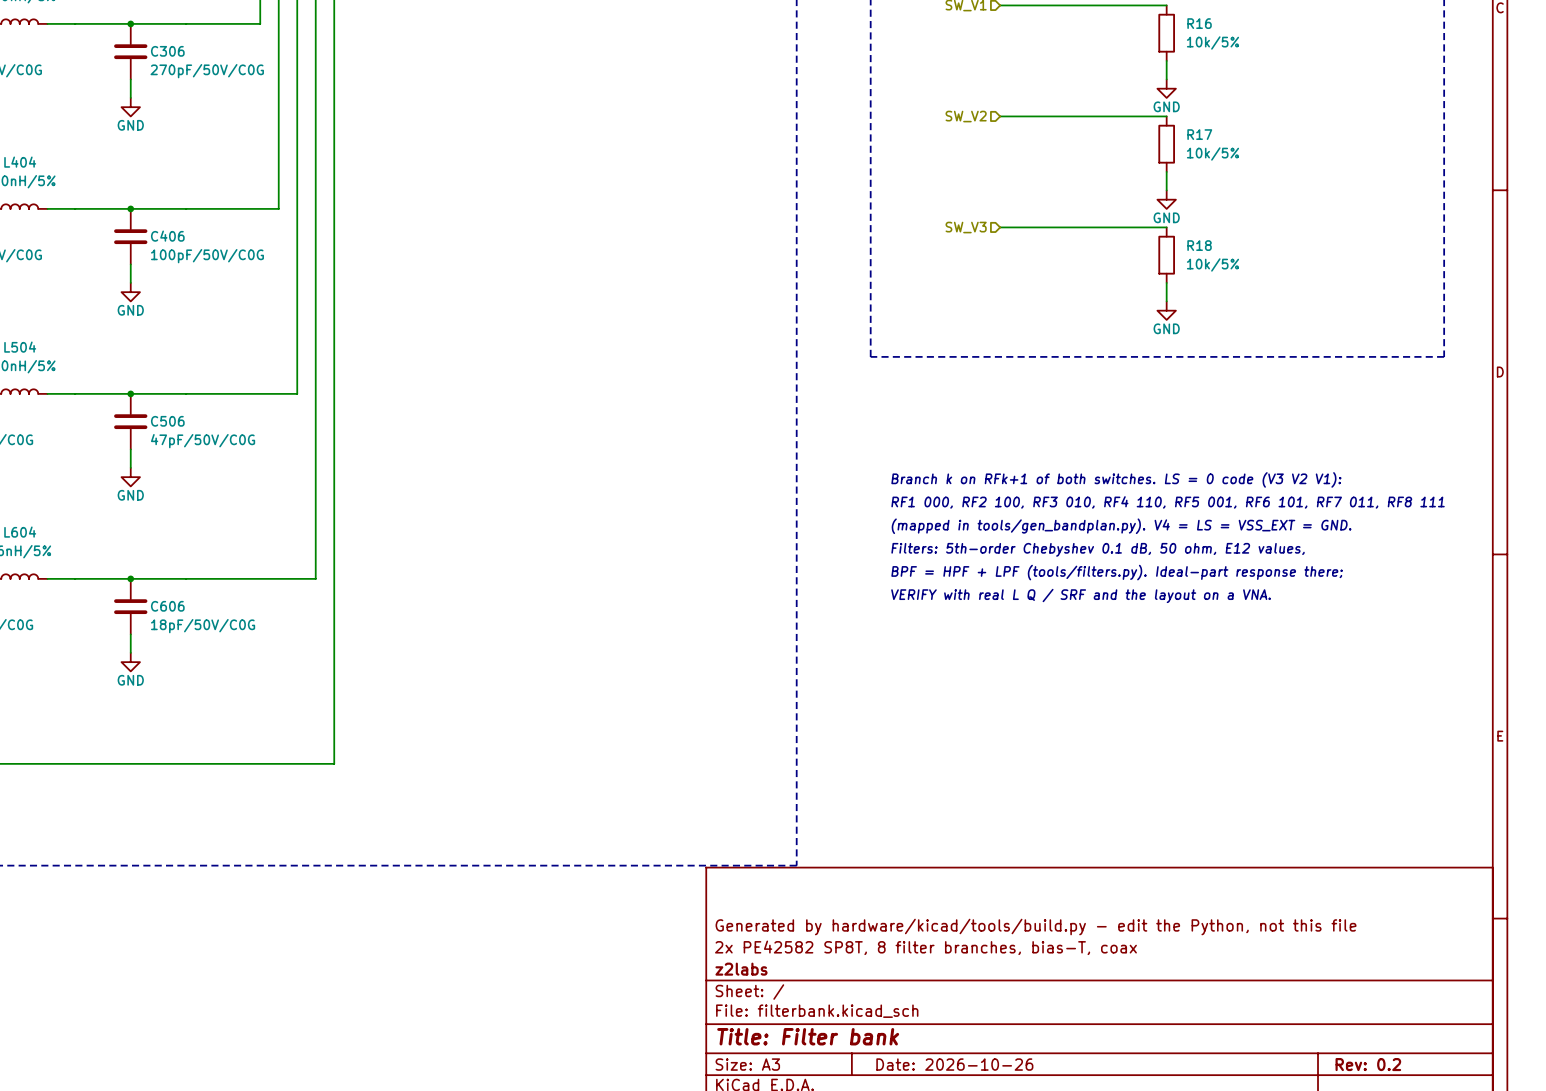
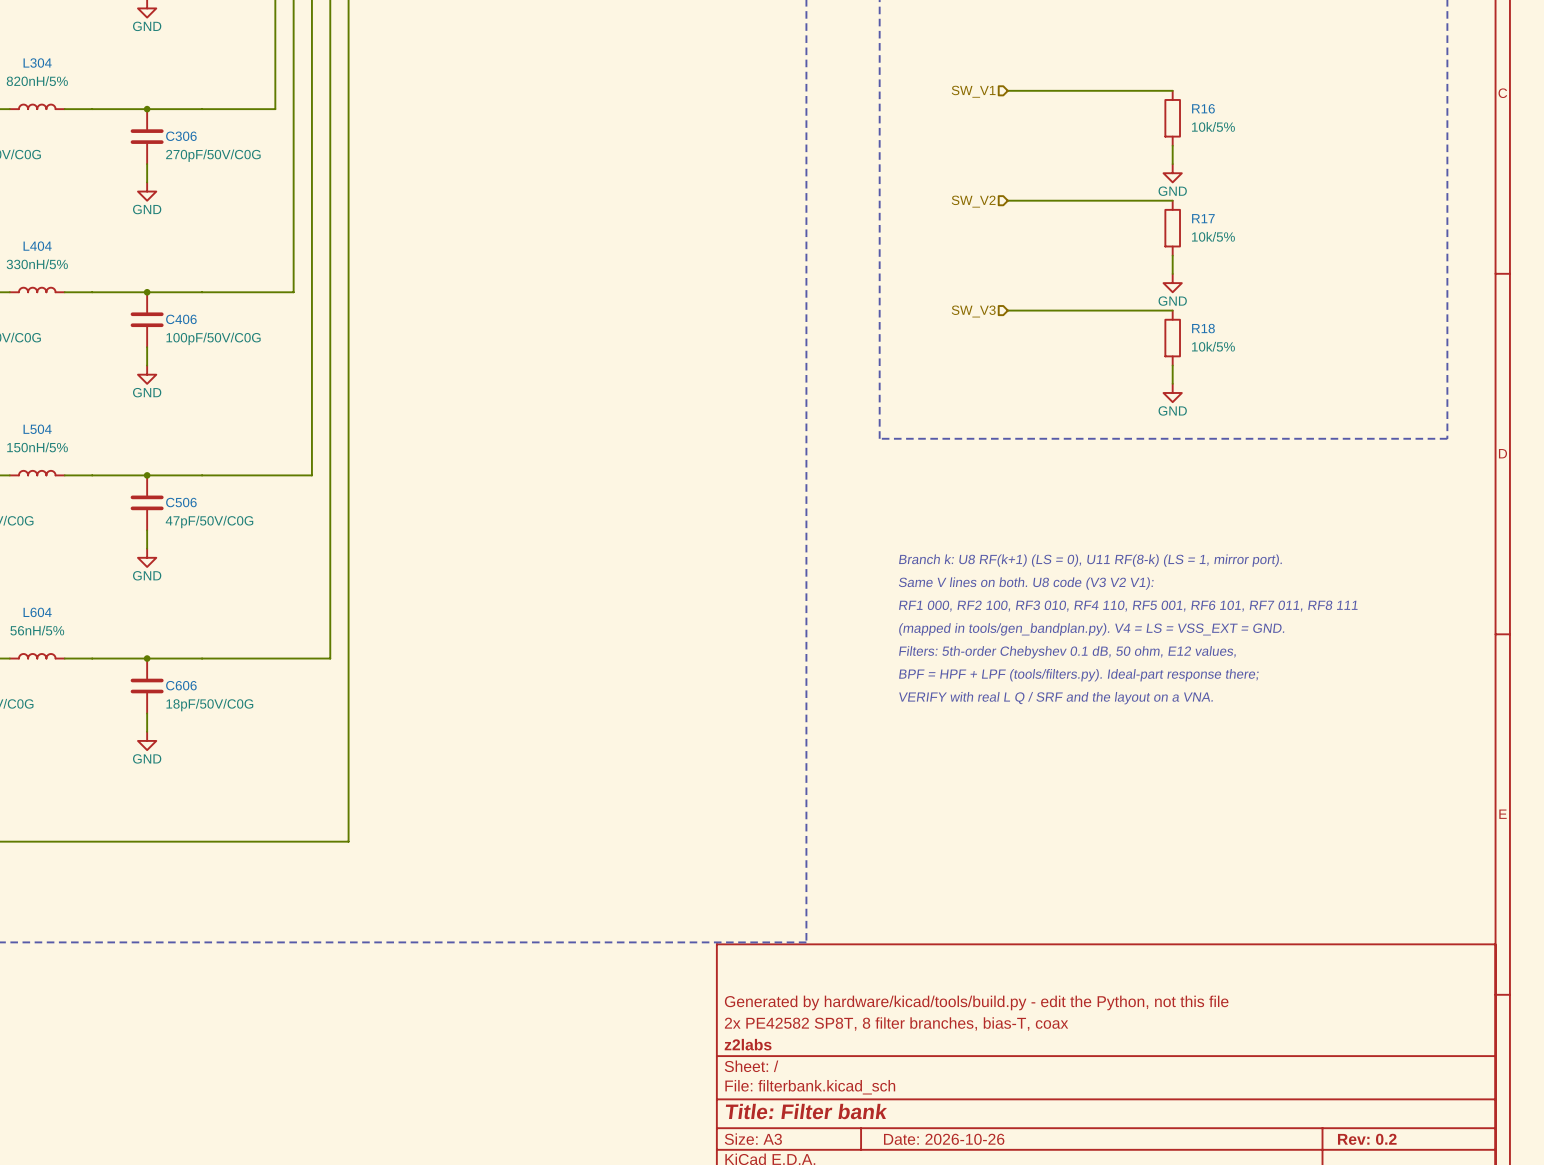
text: Branch k on RFk+1 of both switches. LS = 0 code (V3 V2 V1): (1116, 479) -> Branch k: U8 RF(k+1) (LS = 0), U11 RF(8-k) (LS = 1, mirror port). (1090, 560)
text: RF1 000, RF2 100, RF3 010, RF4 110, RF5 001, RF6 101, RF7 011, RF8 111 (1168, 502) -> Same V lines on both. U8 code (V3 V2 V1): (1026, 583)
text: (mapped in tools/gen_bandplan.py). V4 = LS = VSS_EXT = GND. (1121, 526) -> RF1 000, RF2 100, RF3 010, RF4 110, RF5 001, RF6 101, RF7 011, RF8 111 (1128, 606)
text: Filters: 5th-order Chebyshev 0.1 dB, 50 ohm, E12 values, (1098, 549) -> (mapped in tools/gen_bandplan.py). V4 = LS = VSS_EXT = GND. (1091, 629)
text: BPF = HPF + LPF (tools/filters.py). Ideal-part response there; (1117, 572) -> Filters: 5th-order Chebyshev 0.1 dB, 50 ohm, E12 values, (1067, 652)
text: VERIFY with real L Q / SRF and the layout on a VNA. (1081, 595) -> BPF = HPF + LPF (tools/filters.py). Ideal-part response there; (1078, 675)
text: none -> VERIFY with real L Q / SRF and the layout on a VNA. (1056, 698)

